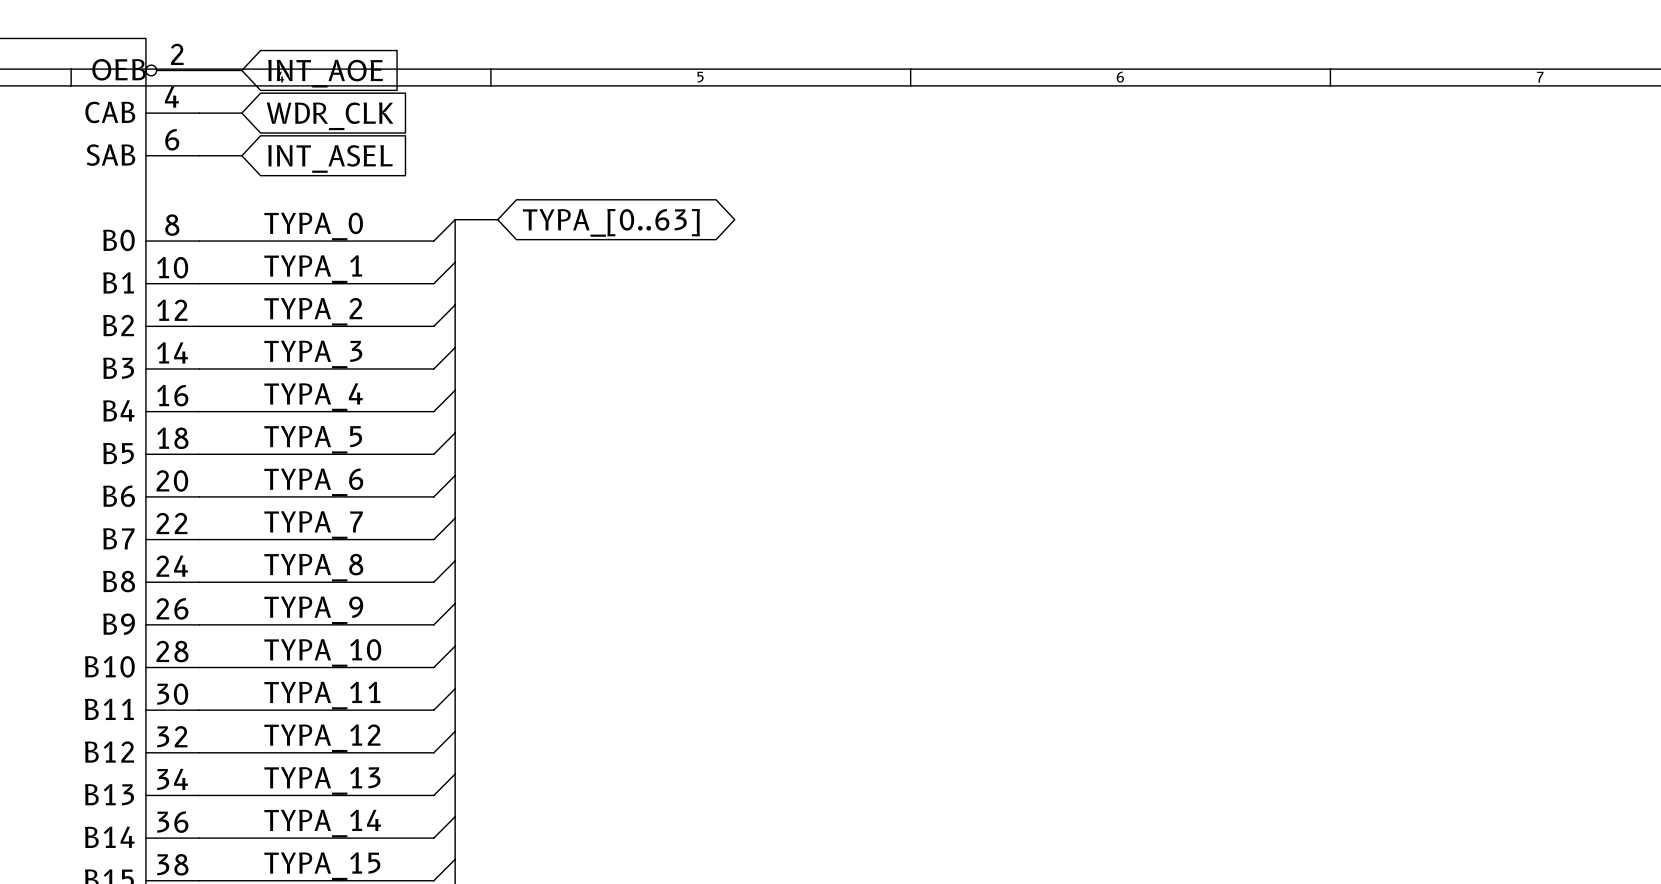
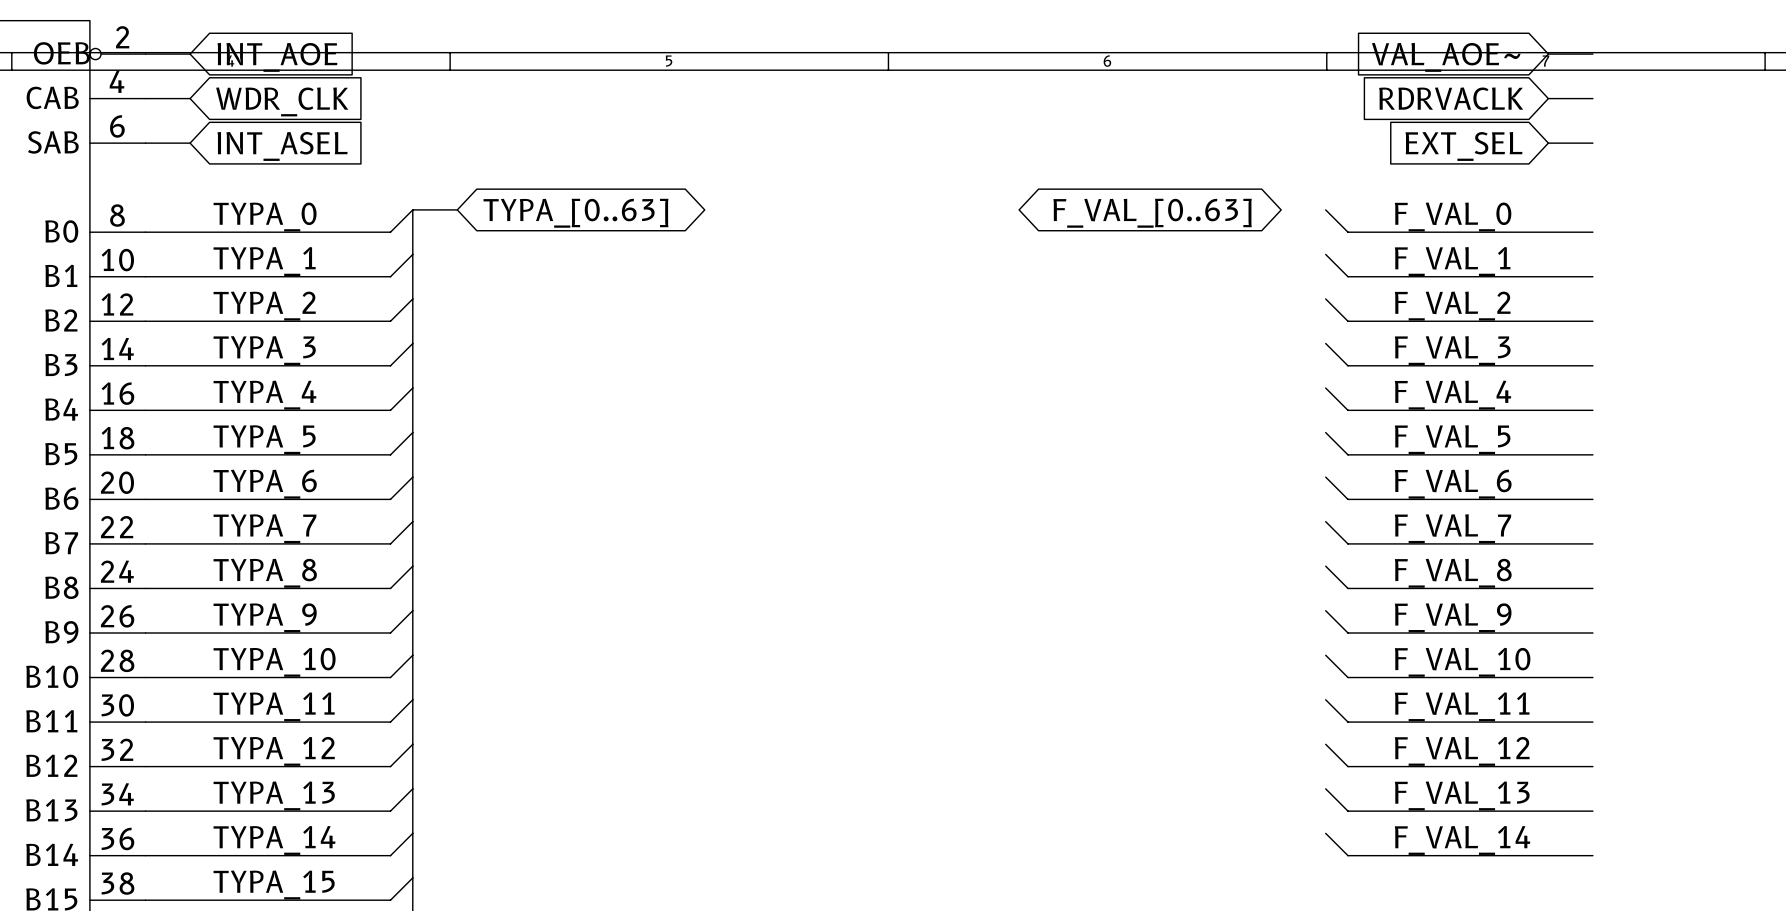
wire: none -> (1548, 54) (1592, 54)
global label: none -> VAL_AOE~ (1446, 57)
global label: none -> RDRVACLK (1451, 98)
wire: none -> (1548, 98) (1592, 98)
wire: none -> (1548, 143) (1592, 143)
global label: none -> EXT_SEL (1464, 146)
wire: none -> (1325, 209) (1347, 232) (1592, 232)
global label: none -> F_VAL_[0..63] (1152, 213)
label: none -> F_VAL_0 (1453, 216)
wire: none -> (1325, 254) (1347, 276) (1592, 276)
label: none -> F_VAL_1 (1452, 261)
wire: none -> (1325, 298) (1347, 321) (1592, 321)
label: none -> F_VAL_2 (1452, 306)
wire: none -> (1325, 343) (1347, 365) (1592, 365)
label: none -> F_VAL_3 (1452, 350)
wire: none -> (1325, 388) (1347, 410) (1592, 410)
label: none -> F_VAL_4 (1453, 395)
wire: none -> (1325, 432) (1347, 454) (1592, 454)
label: none -> F_VAL_5 (1452, 439)
wire: none -> (1325, 477) (1347, 499) (1592, 499)
label: none -> F_VAL_6 (1453, 484)
wire: none -> (1325, 521) (1347, 543) (1592, 543)
label: none -> F_VAL_7 (1453, 528)
wire: none -> (1325, 566) (1347, 588) (1592, 588)
label: none -> F_VAL_8 (1453, 573)
wire: none -> (1325, 610) (1347, 632) (1592, 632)
label: none -> F_VAL_9 (1453, 617)
wire: none -> (1325, 655) (1347, 677) (1592, 677)
label: none -> F_VAL_10 (1462, 662)
wire: none -> (1325, 699) (1347, 722) (1592, 722)
label: none -> F_VAL_11 (1462, 706)
wire: none -> (1325, 744) (1347, 766) (1592, 766)
label: none -> F_VAL_12 (1462, 751)
wire: none -> (1325, 788) (1347, 811) (1592, 811)
label: none -> F_VAL_13 (1462, 795)
wire: none -> (1325, 833) (1347, 855) (1592, 855)
label: none -> F_VAL_14 (1462, 840)

